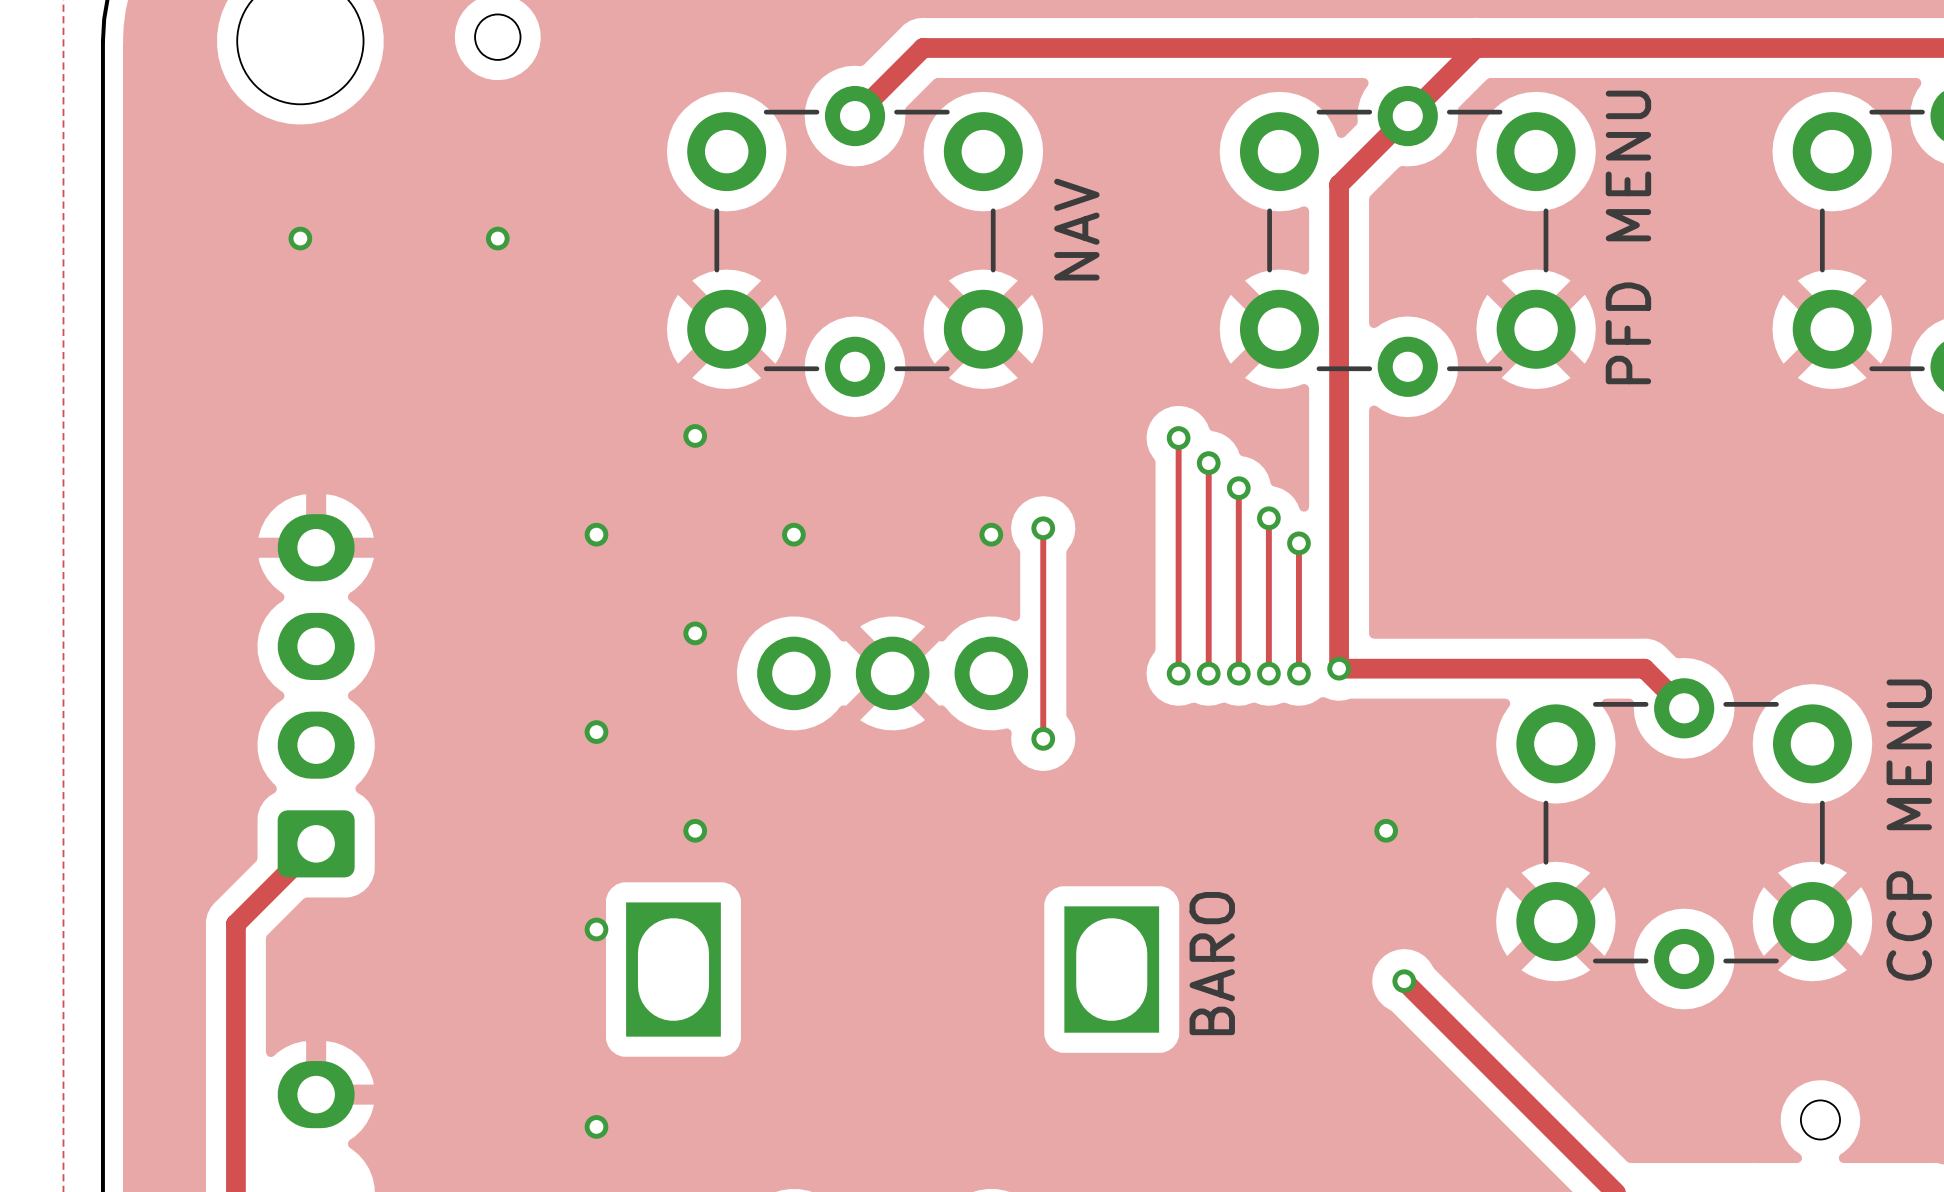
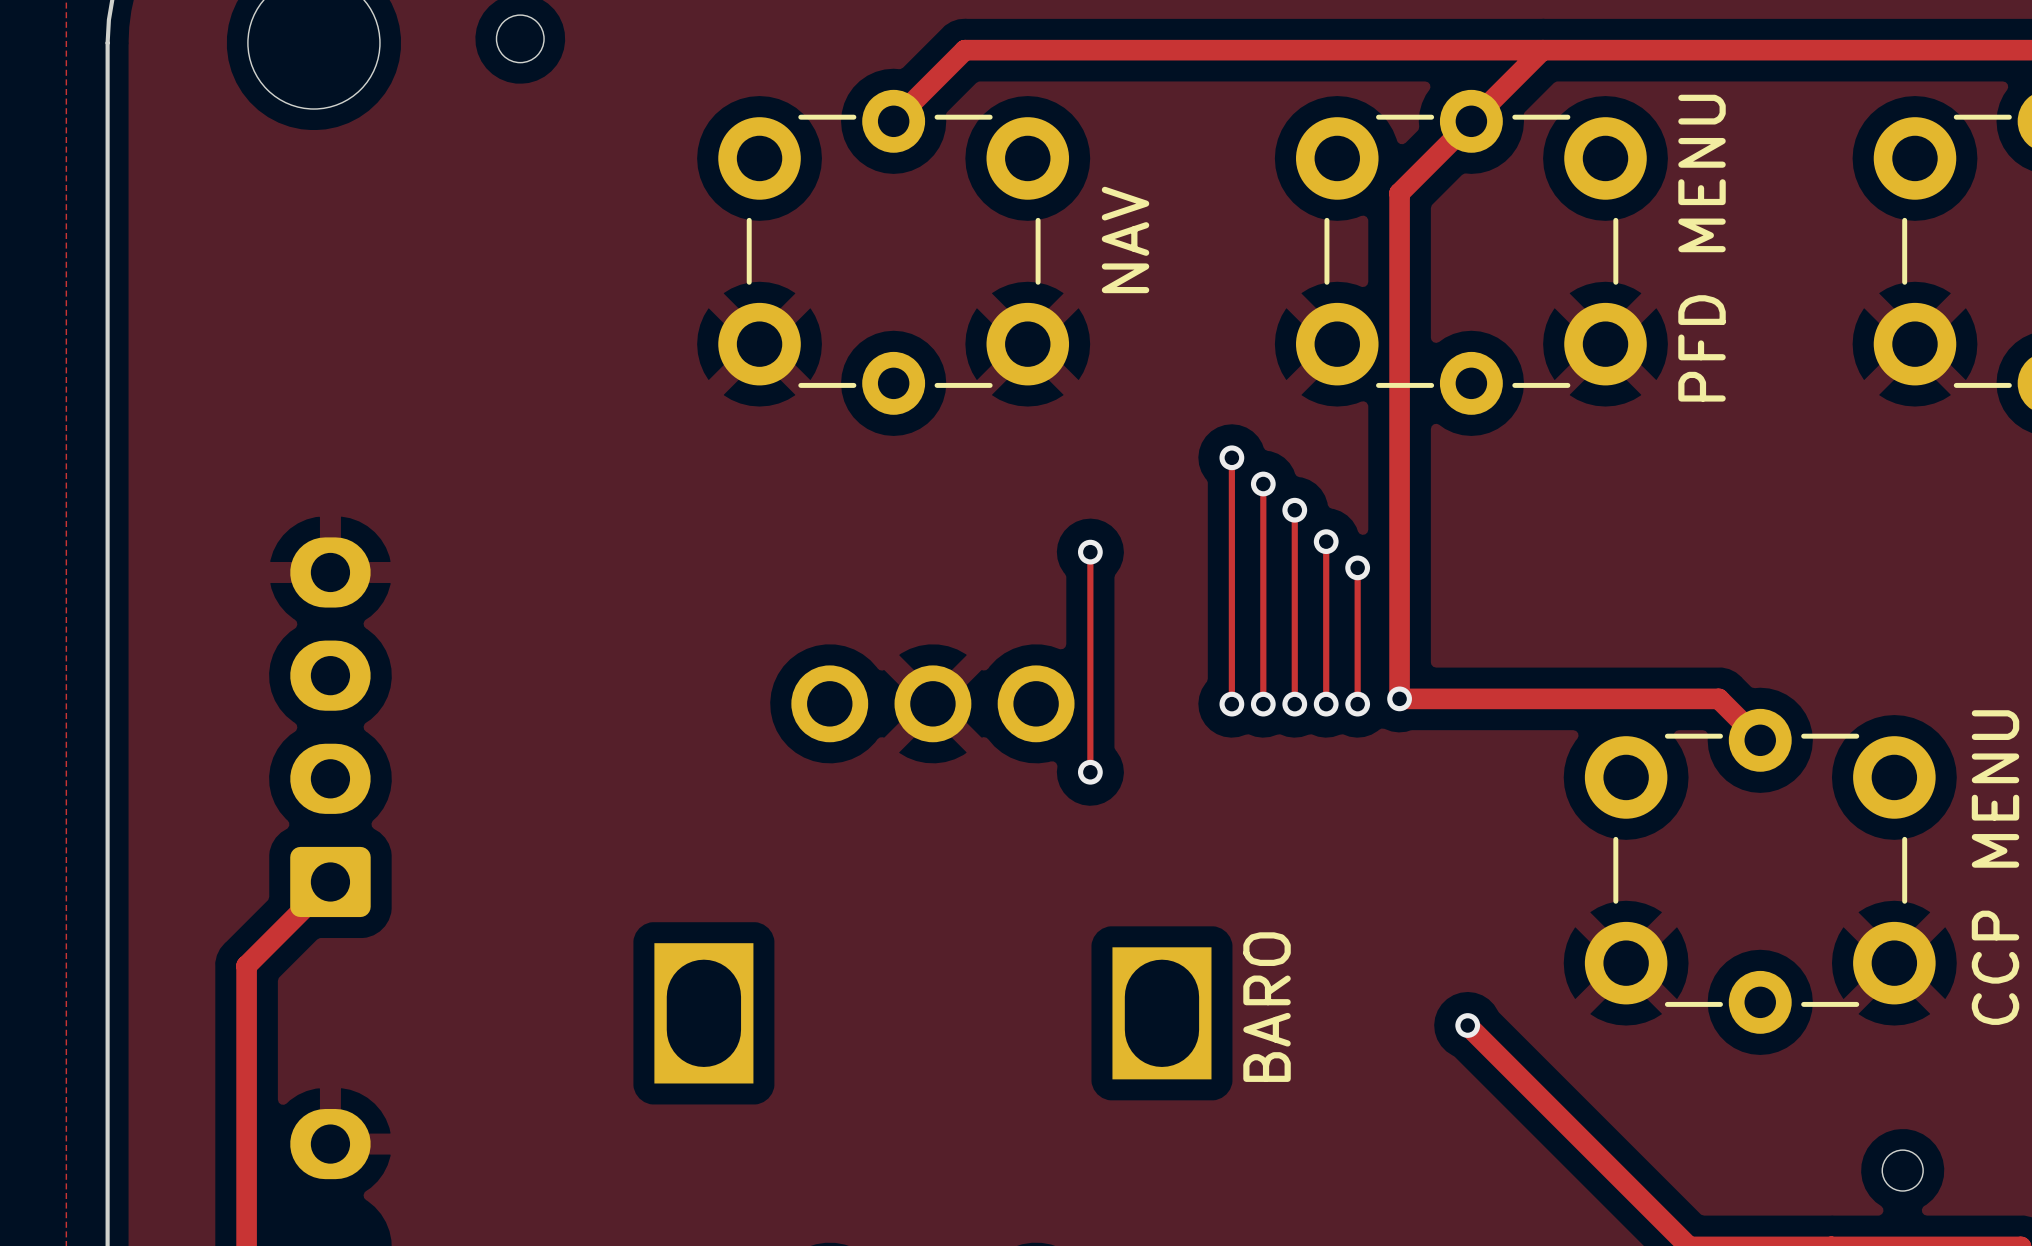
via: (300, 238) -> none
via: (497, 238) -> none
via: (695, 435) -> none
via: (596, 534) -> none
via: (793, 534) -> none
via: (991, 534) -> none
via: (695, 633) -> none
via: (596, 732) -> none
via: (695, 830) -> none
via: (1386, 830) -> none
via: (596, 929) -> none
via: (596, 1126) -> none

